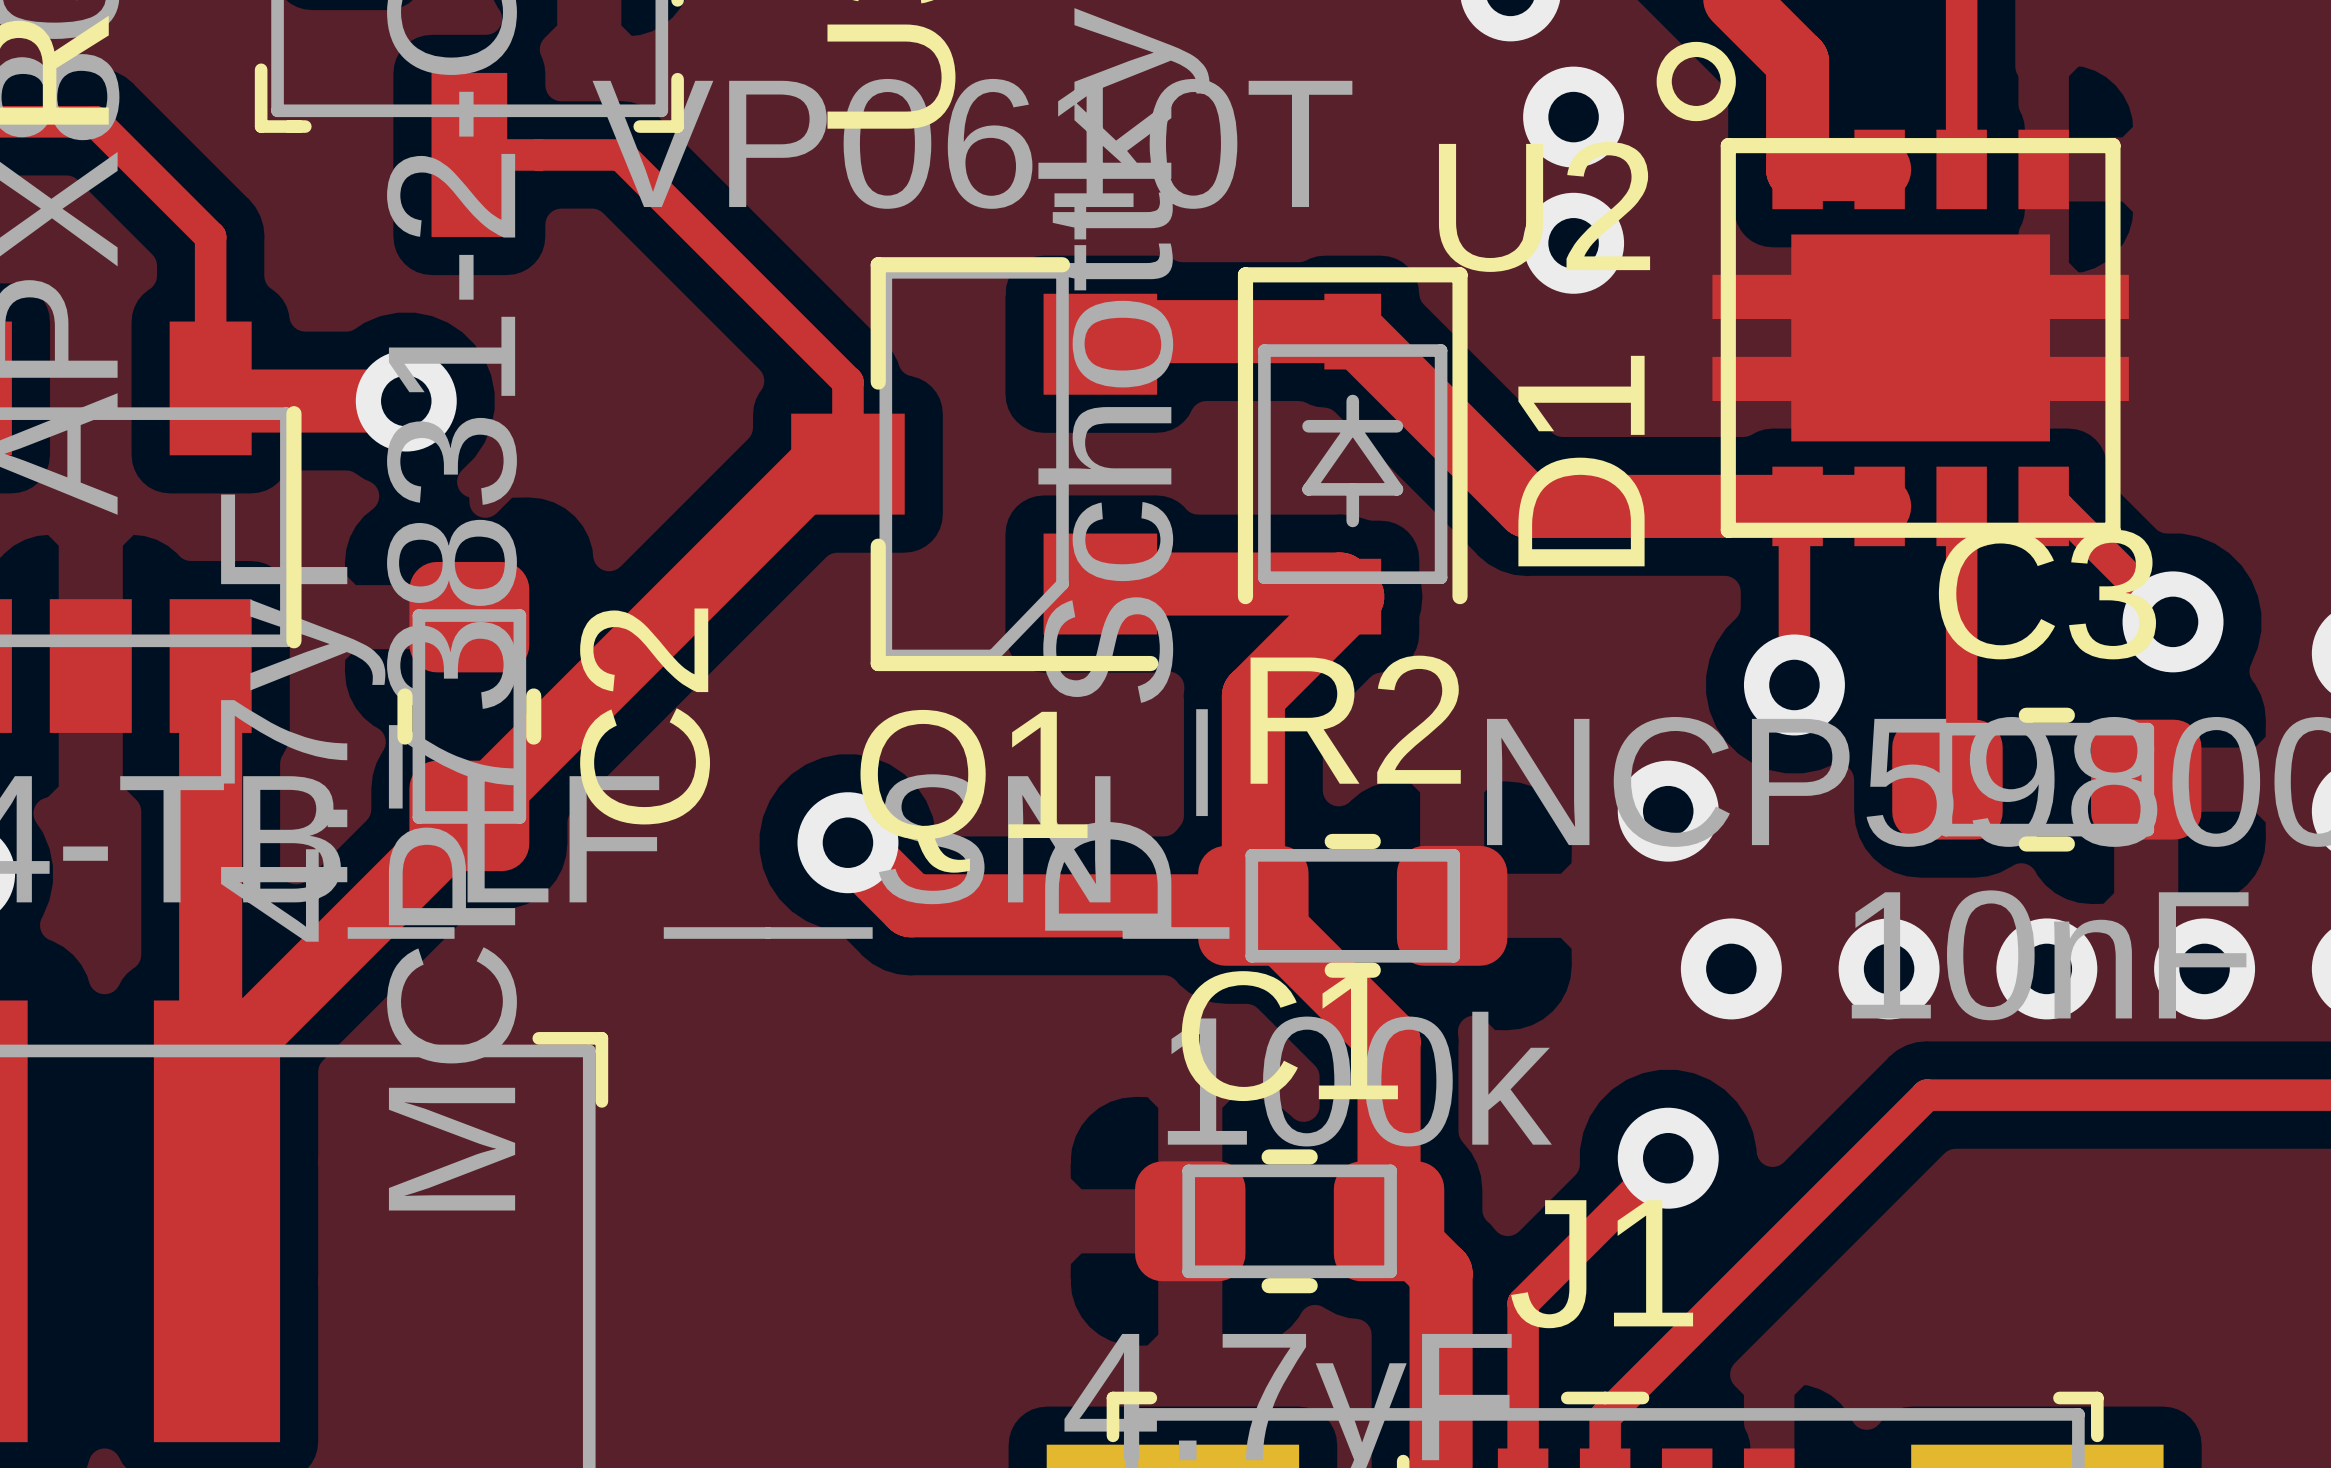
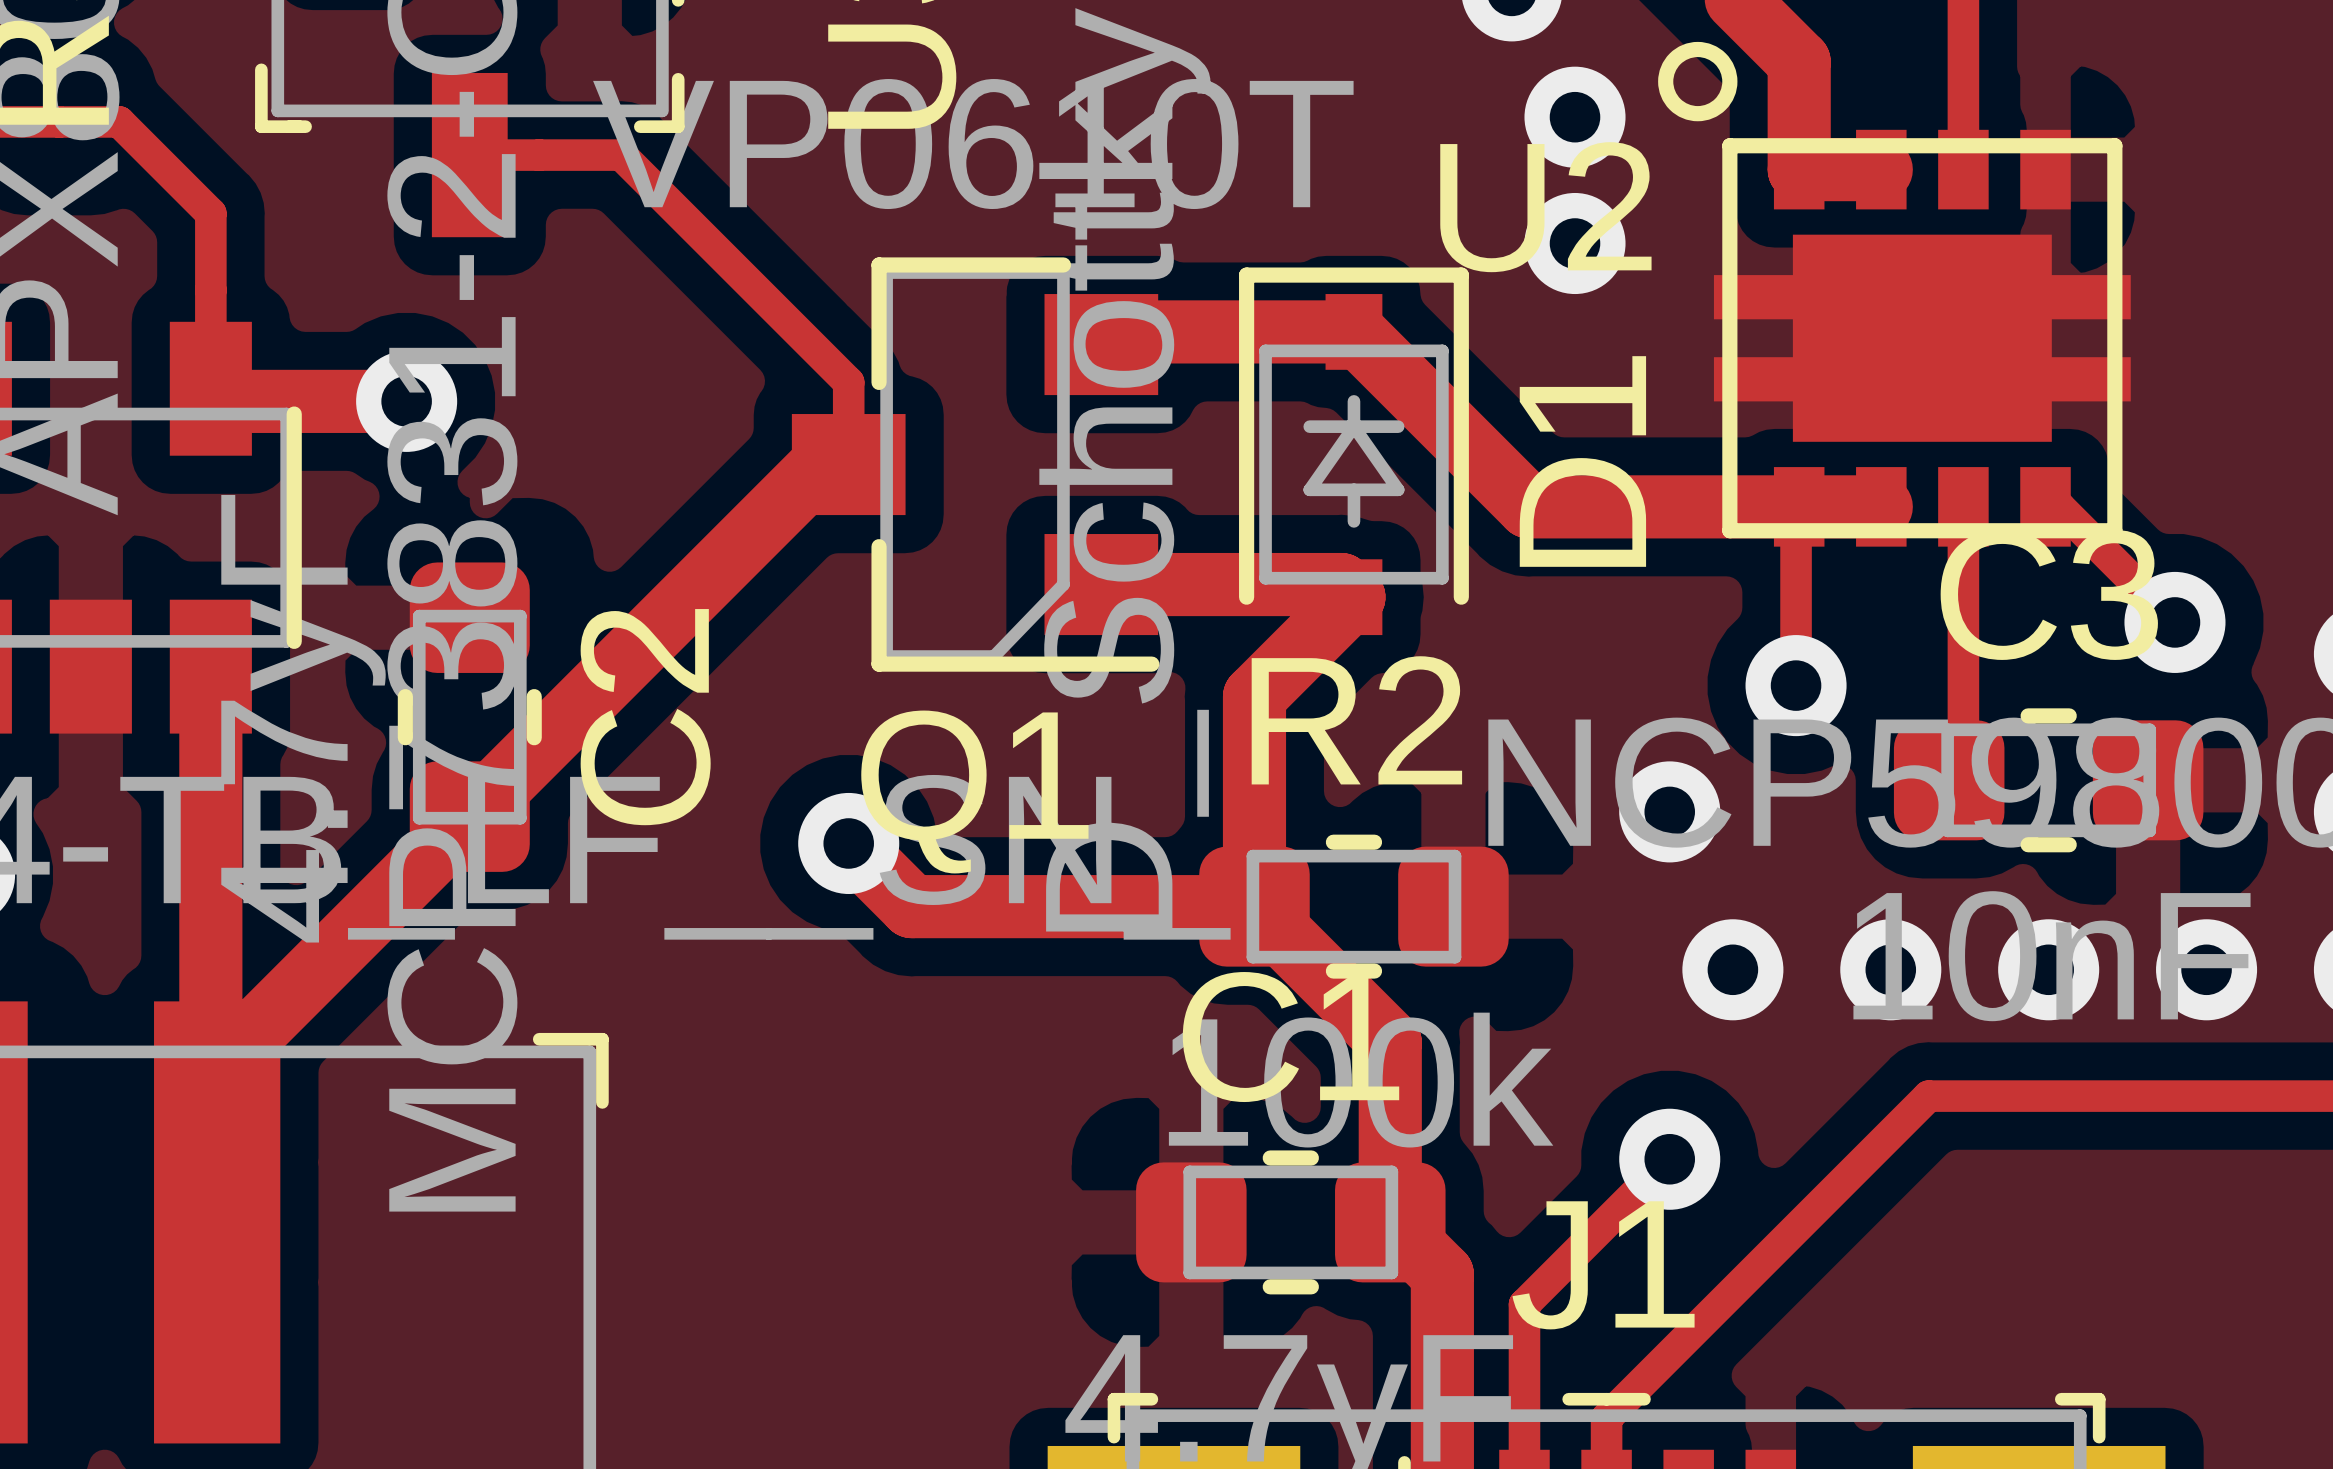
track: (95, 121) (210, 236) -> (95, 121) (119, 121) (210, 213) (210, 237)

